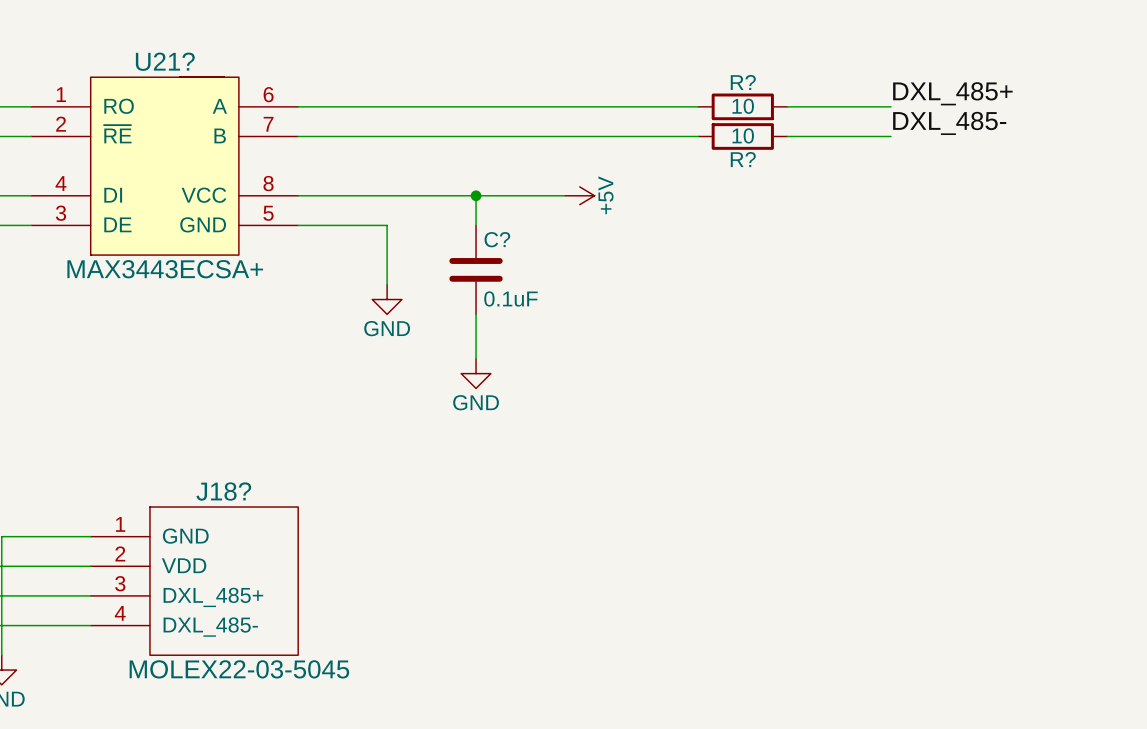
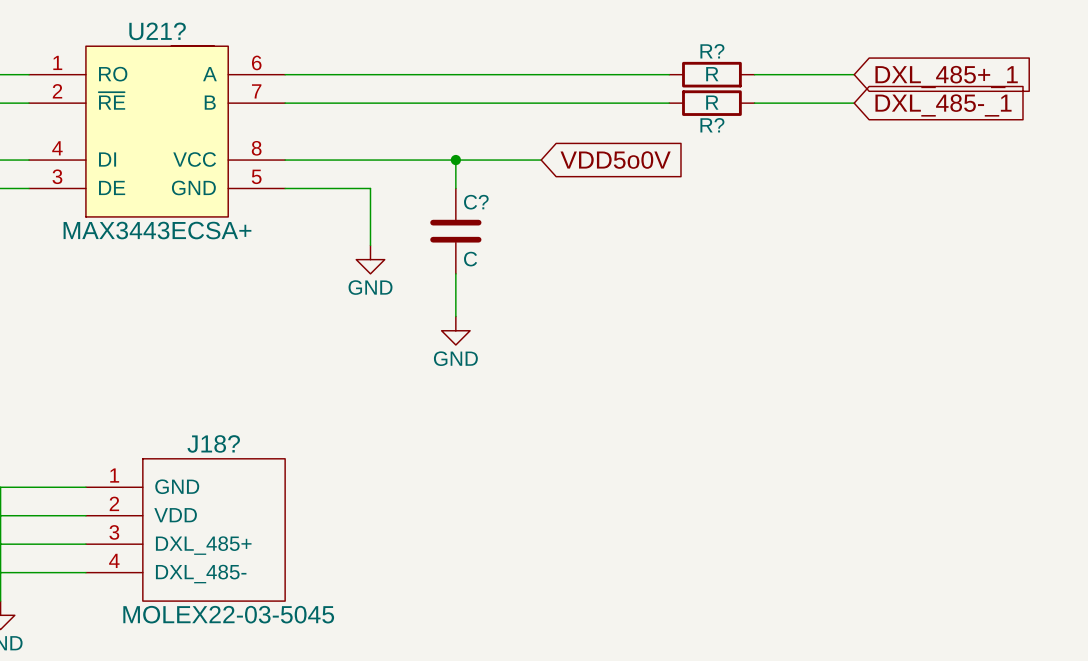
label: DXL_485+ (952, 93) -> none
R? value: 10 (743, 106) -> R (712, 74)
global label: none -> DXL_485+_1 (946, 77)
label: DXL_485- (949, 123) -> none
R? value: 10 (743, 135) -> R (712, 102)
global label: none -> DXL_485-_1 (943, 105)
power symbol: +5V (579, 195) -> none
global label: none -> VDD5o0V (615, 160)
C? value: 0.1uF (510, 298) -> C (470, 259)

